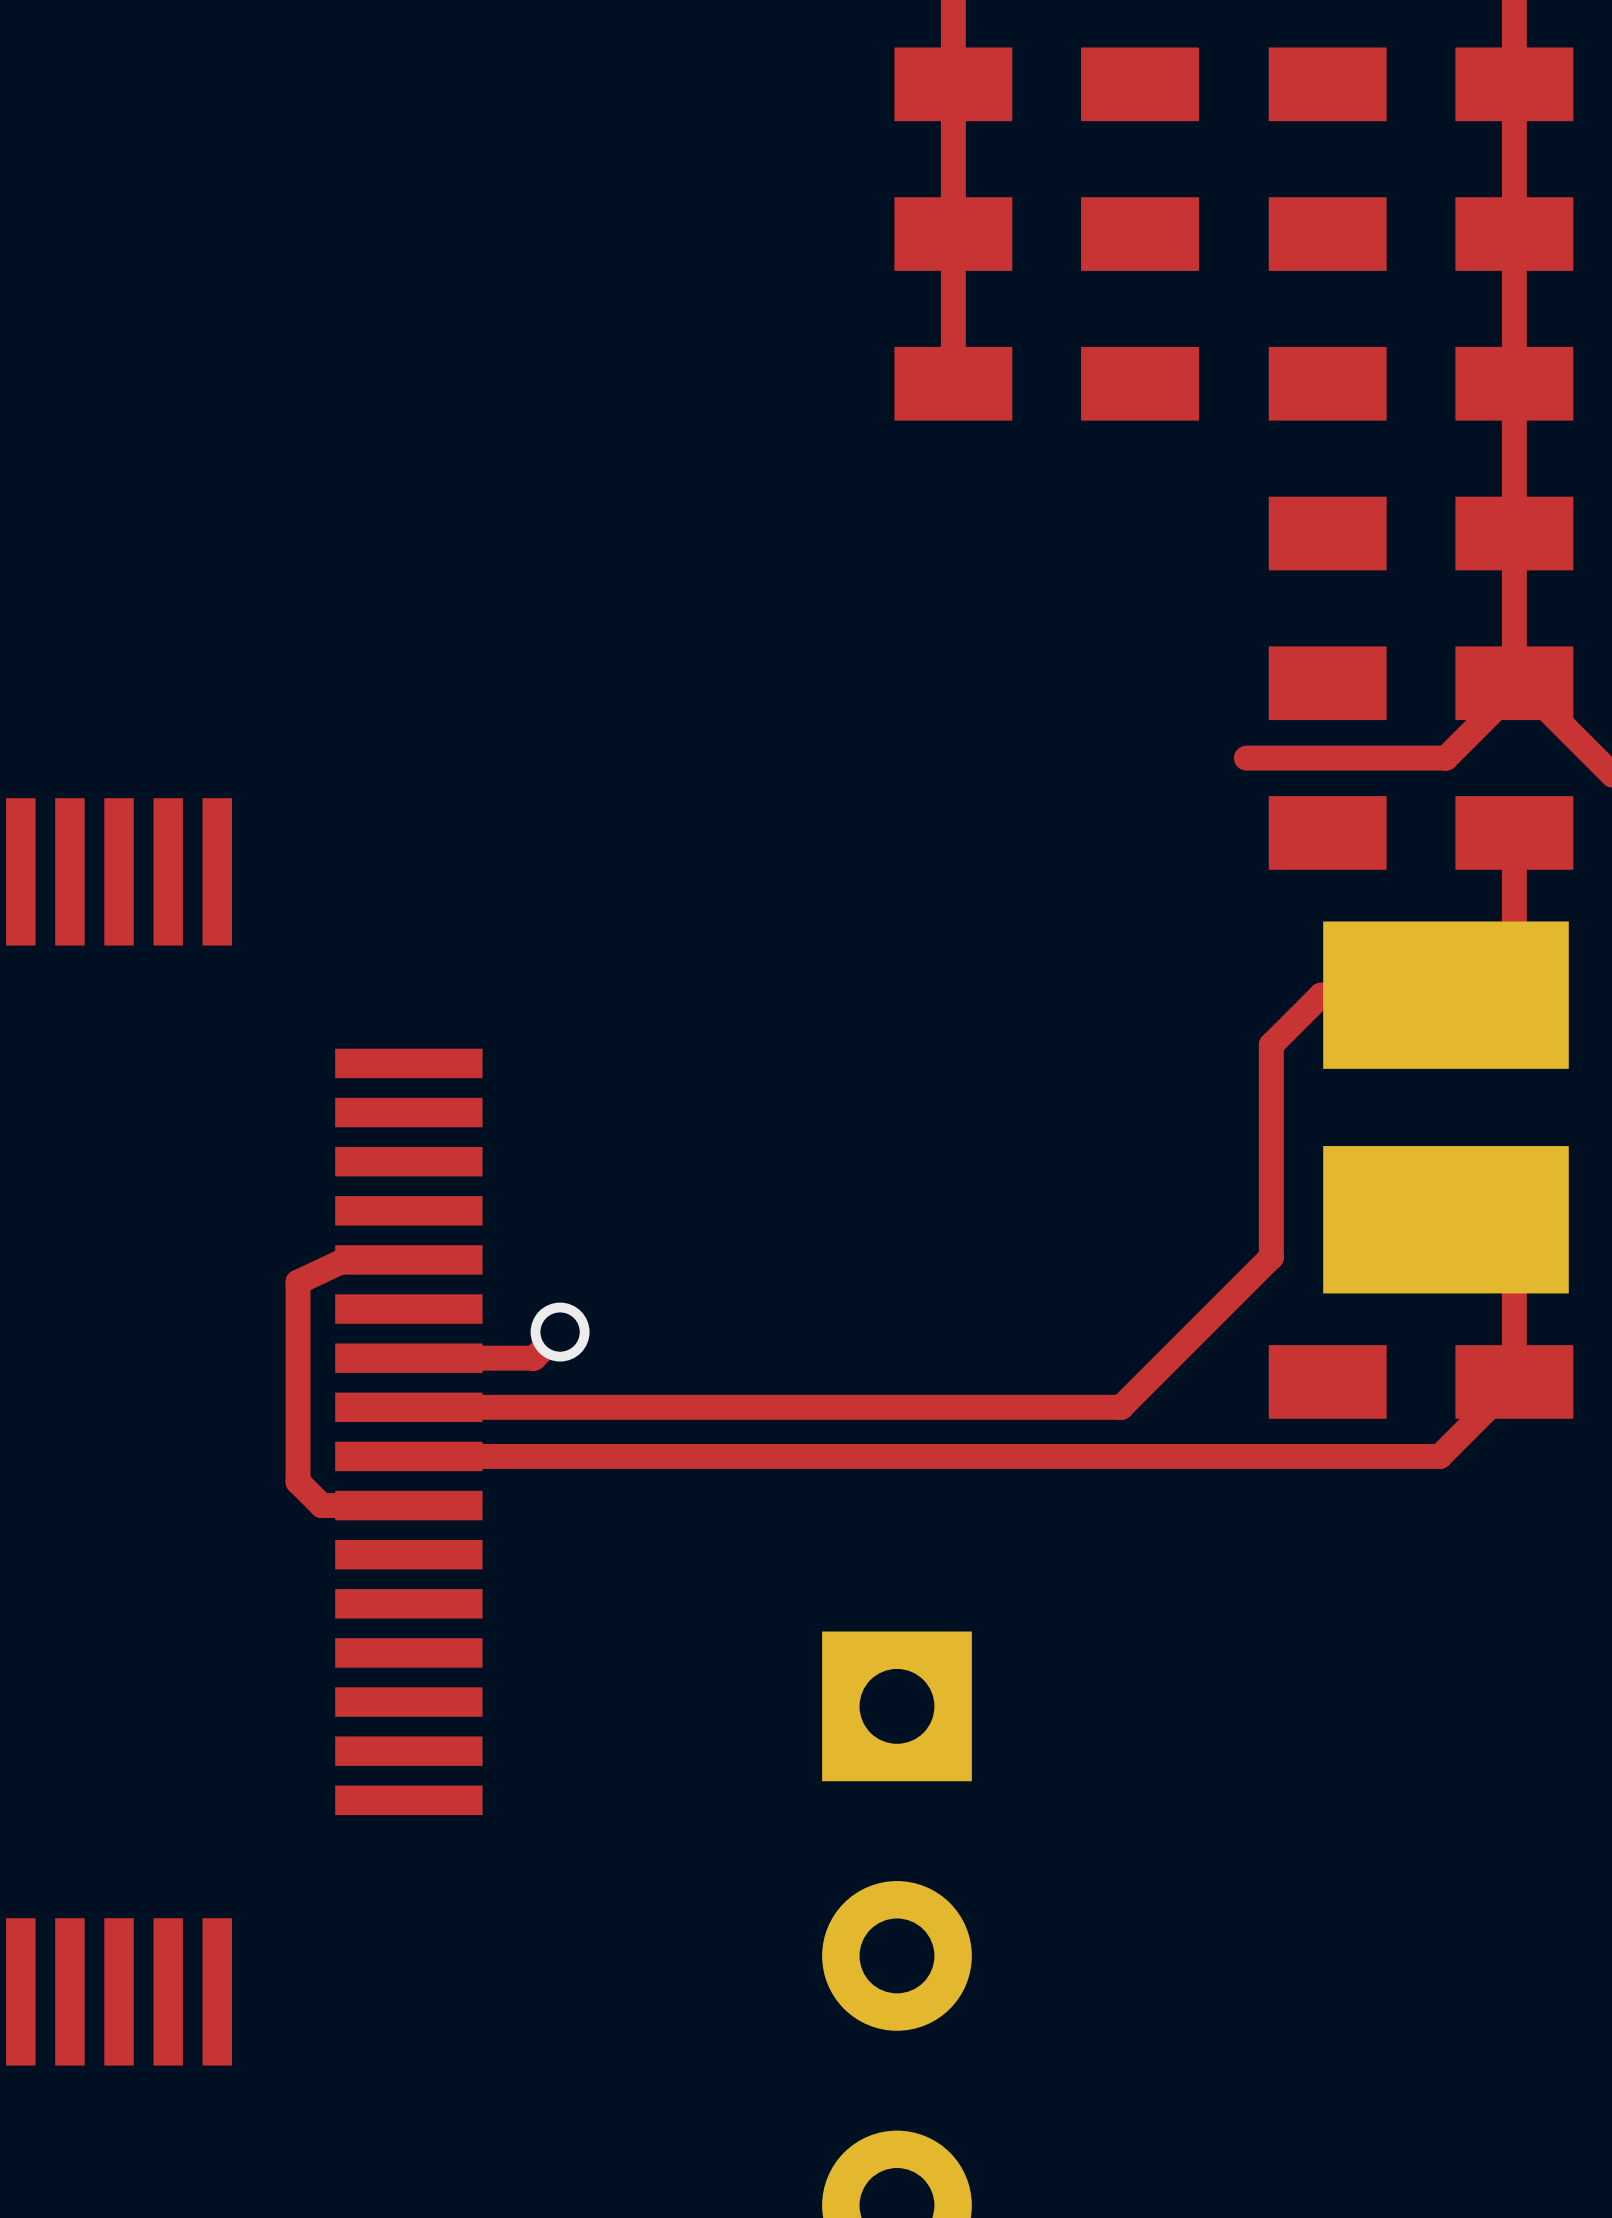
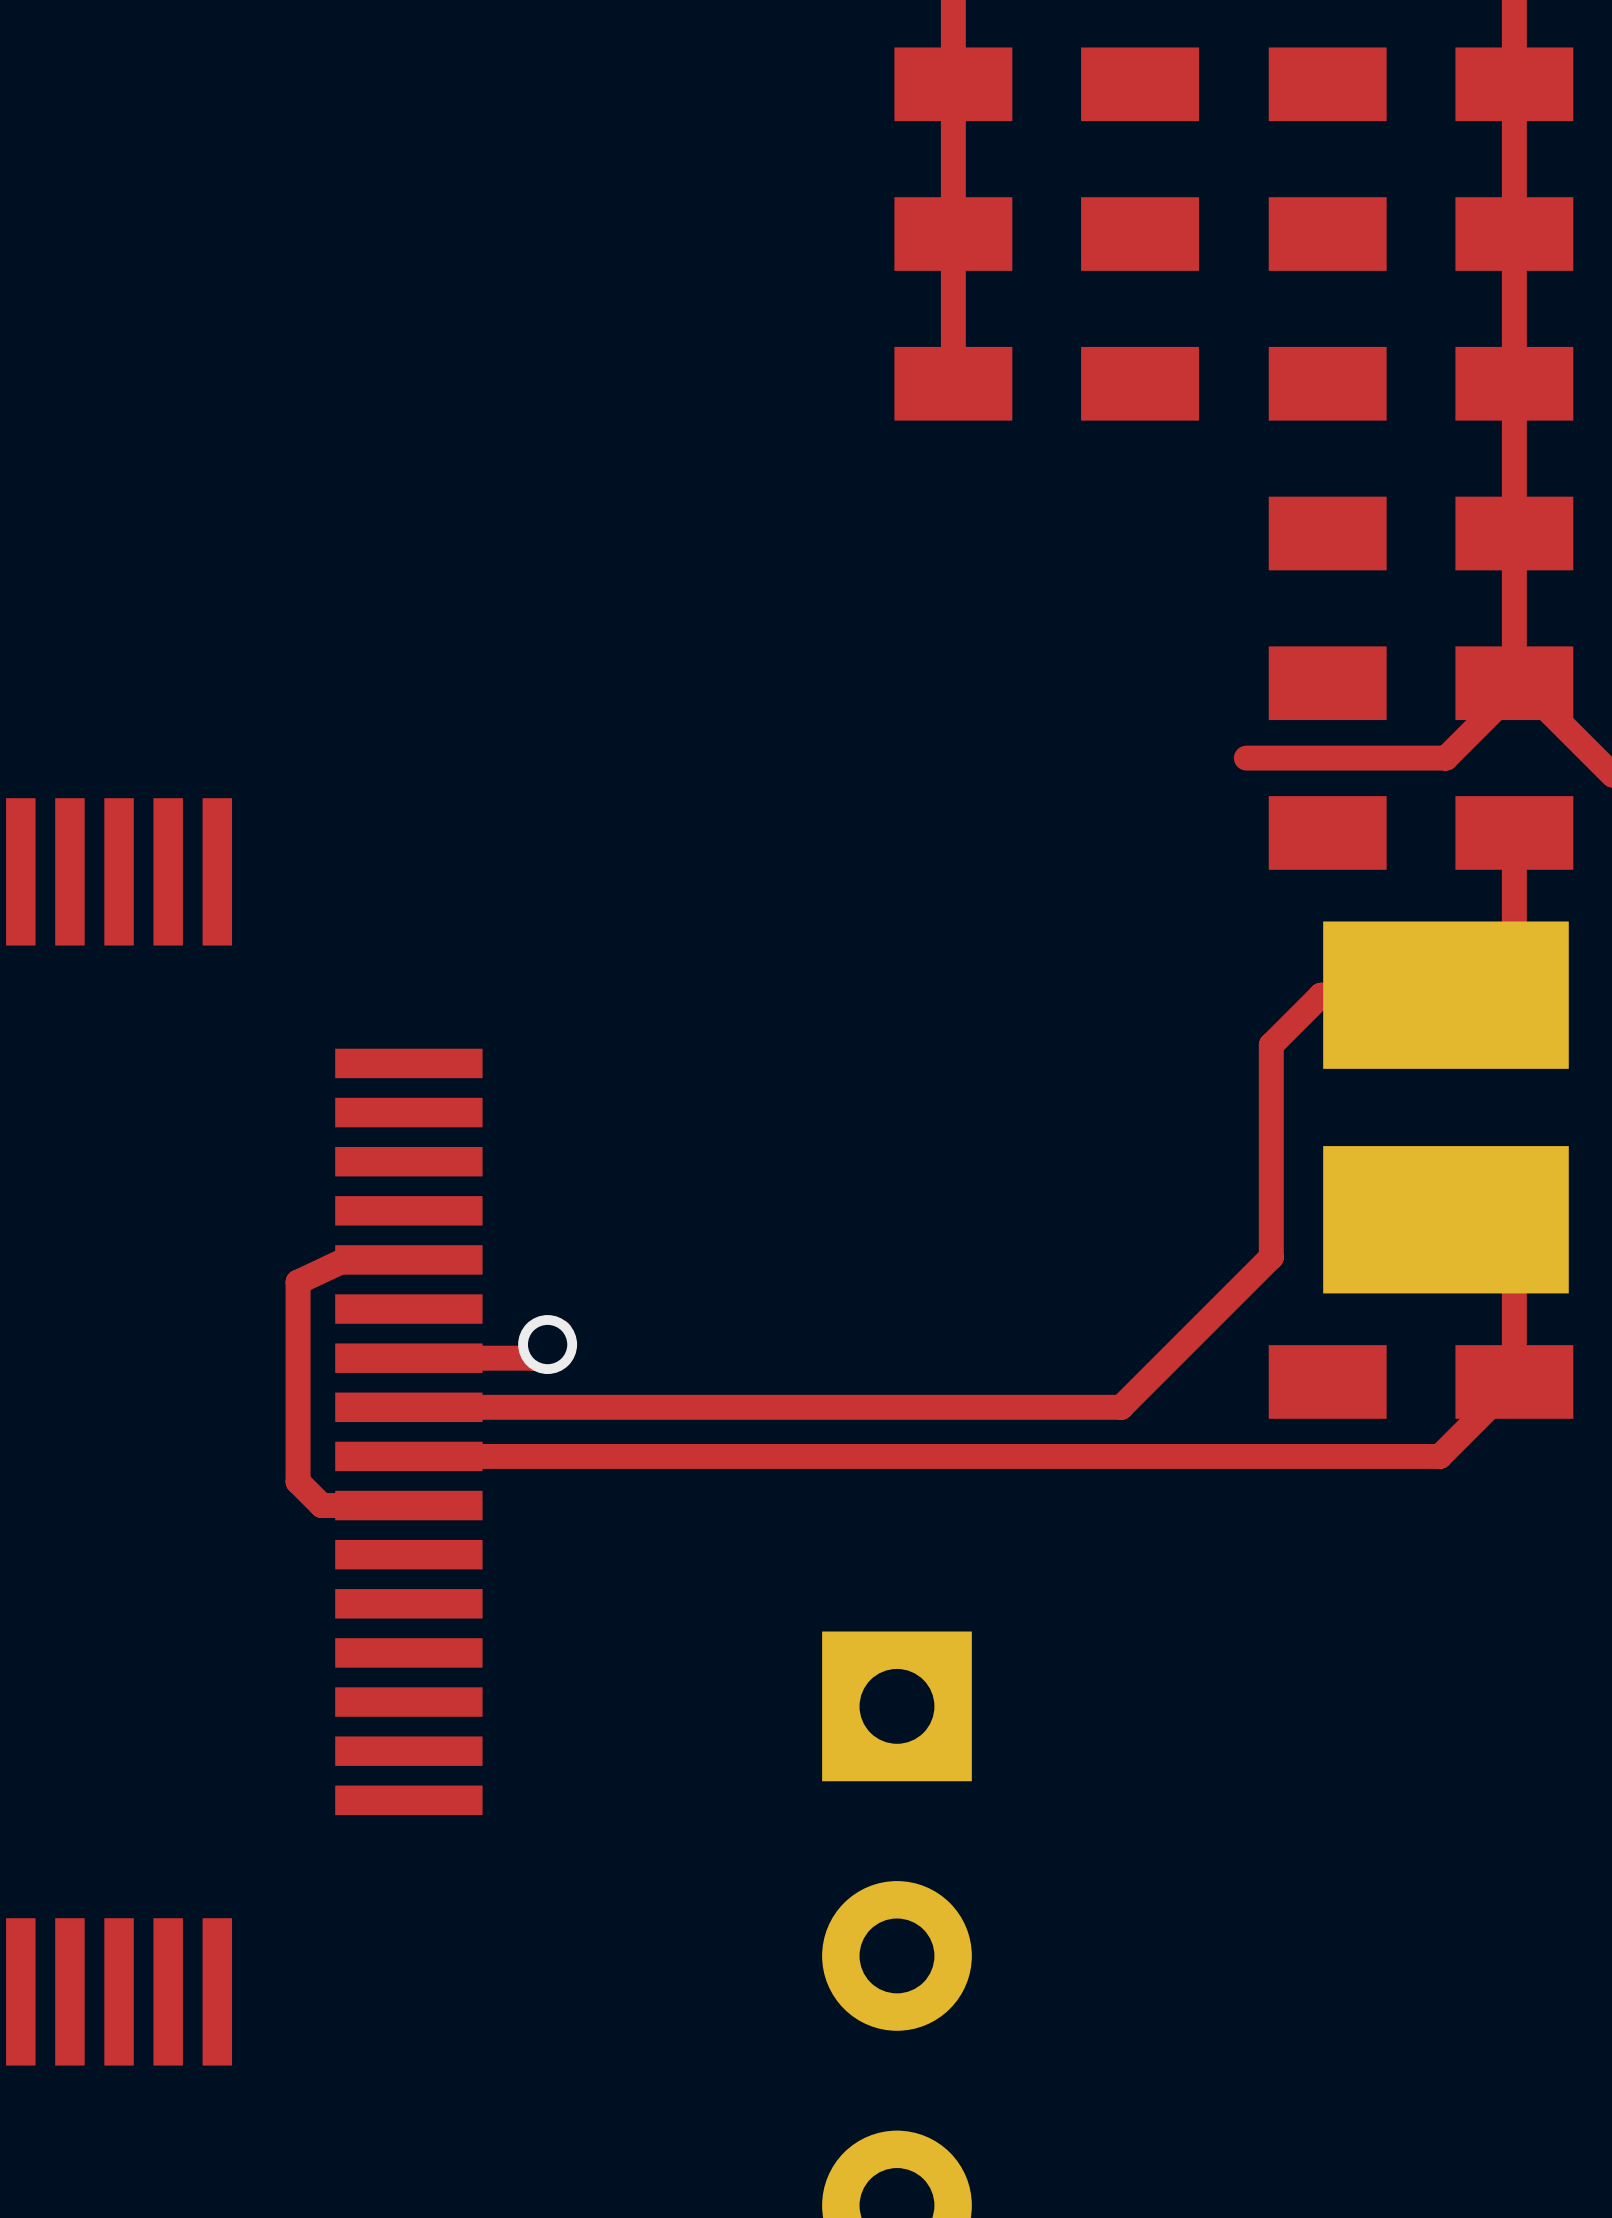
via position: (560, 1332) -> (547, 1344)

